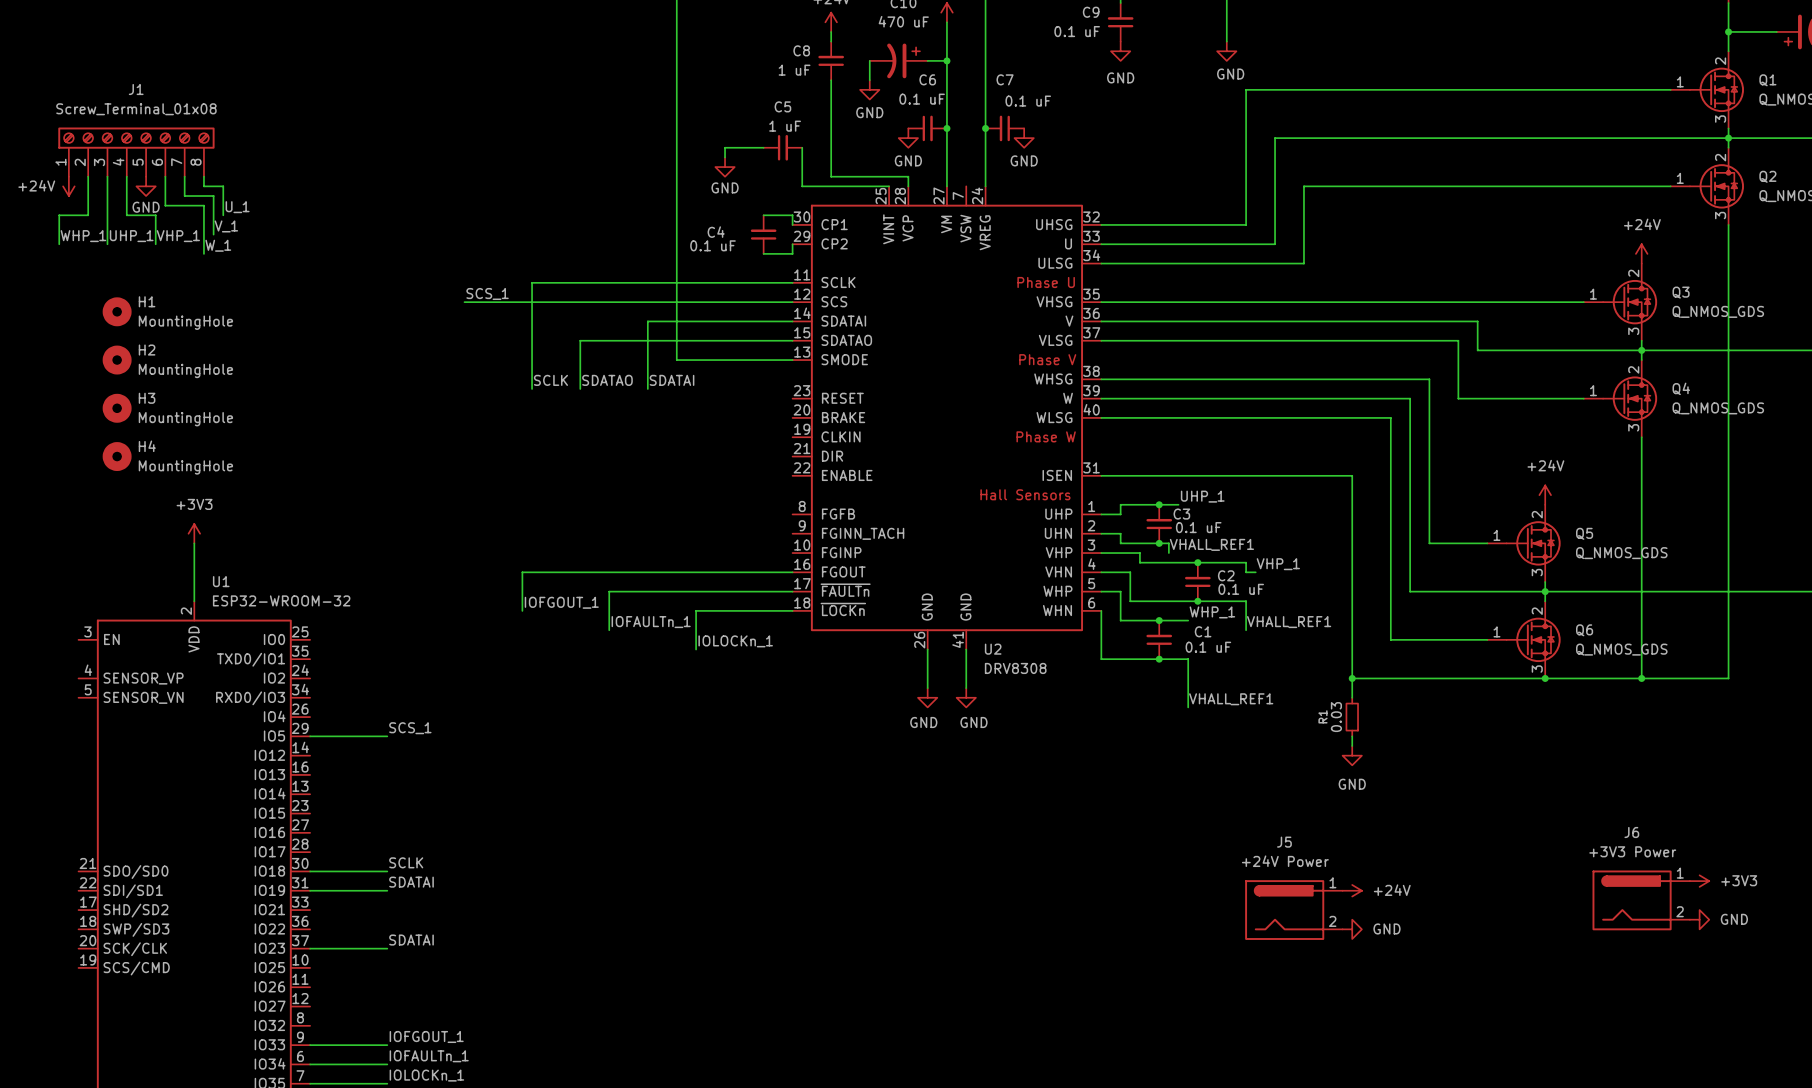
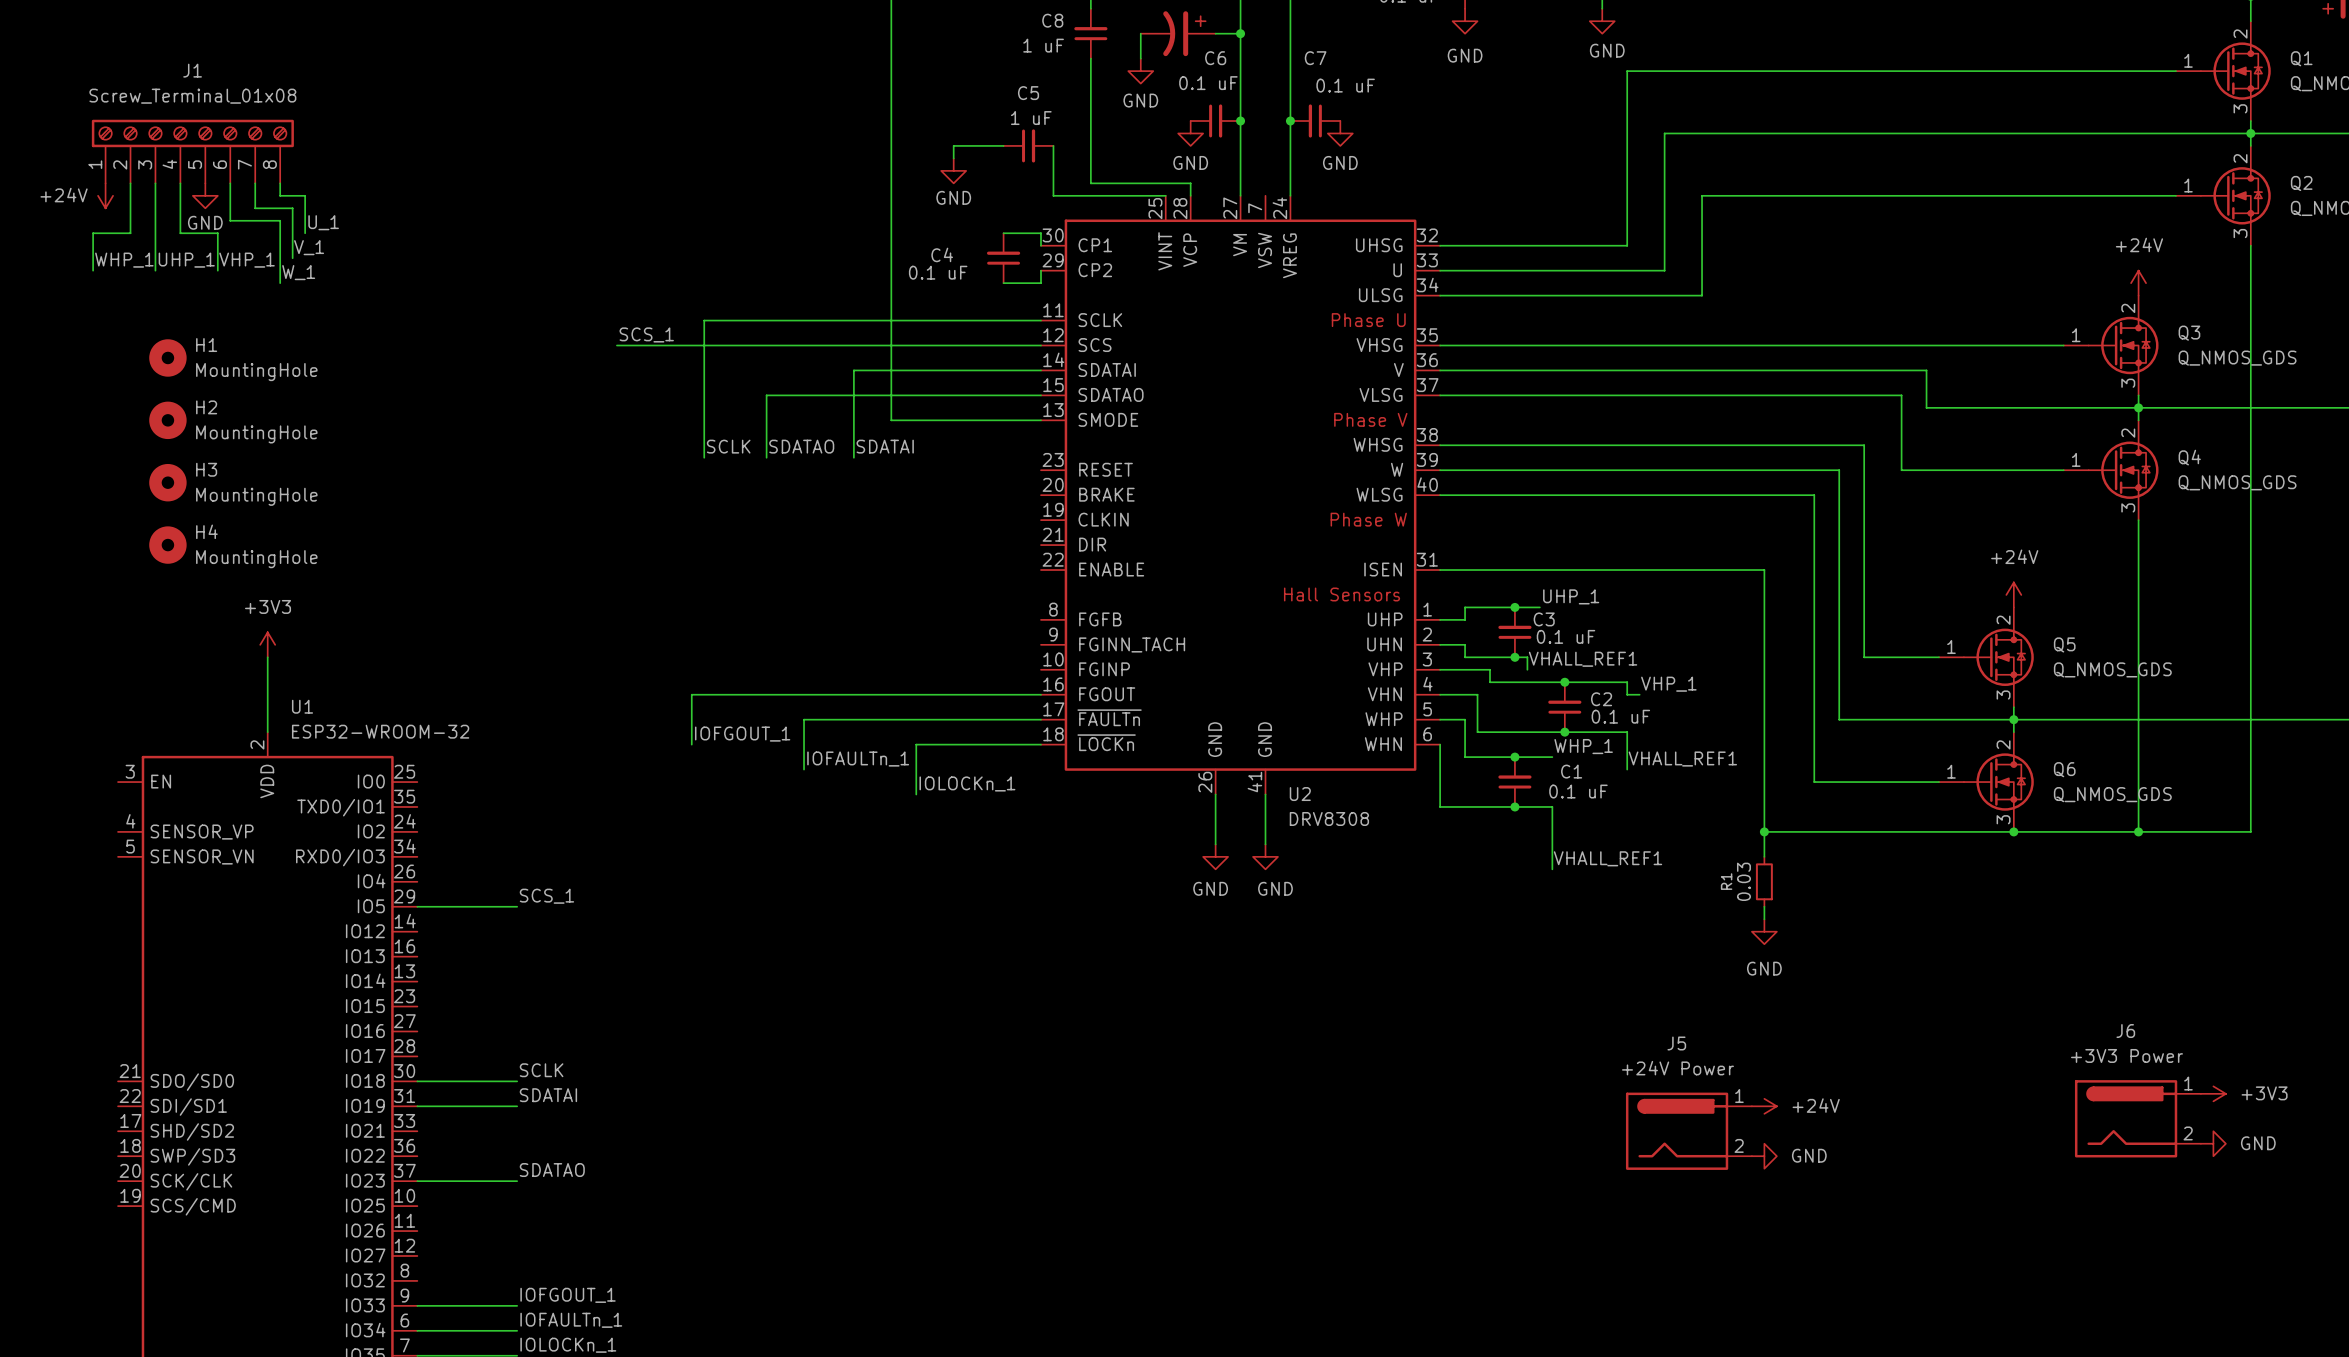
label: SDATAI (411, 940) -> SDATAO (552, 1170)

